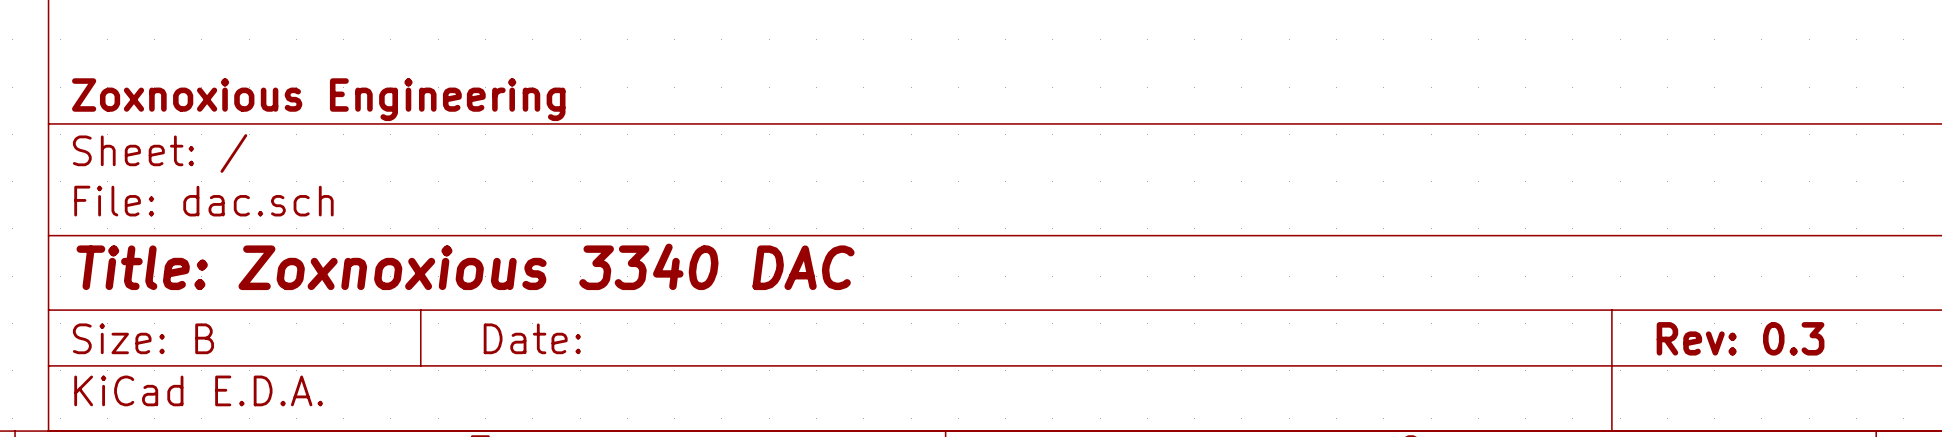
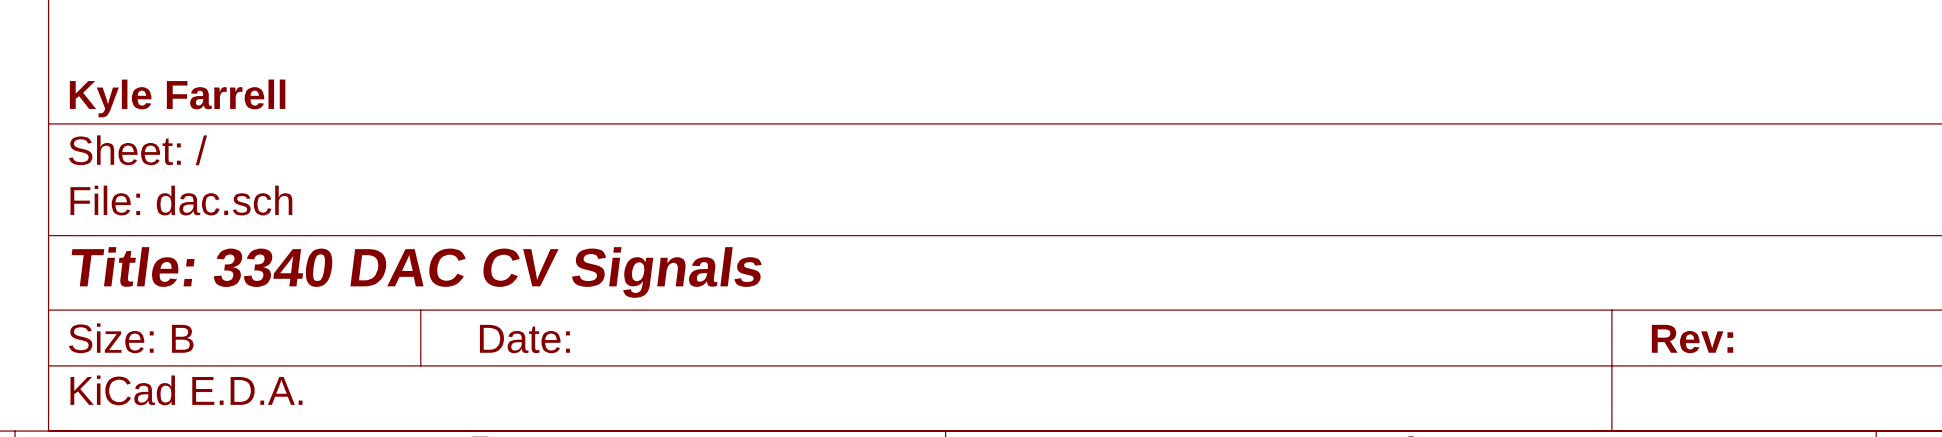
title block: Zoxnoxious Engineering (318, 99) -> Kyle Farrell (177, 98)
title block: Title: Zoxnoxious 3340 DAC (465, 266) -> Title: 3340 DAC CV Signals (416, 272)
title block: Rev: 0.3 (1740, 338) -> Rev: (1692, 339)

